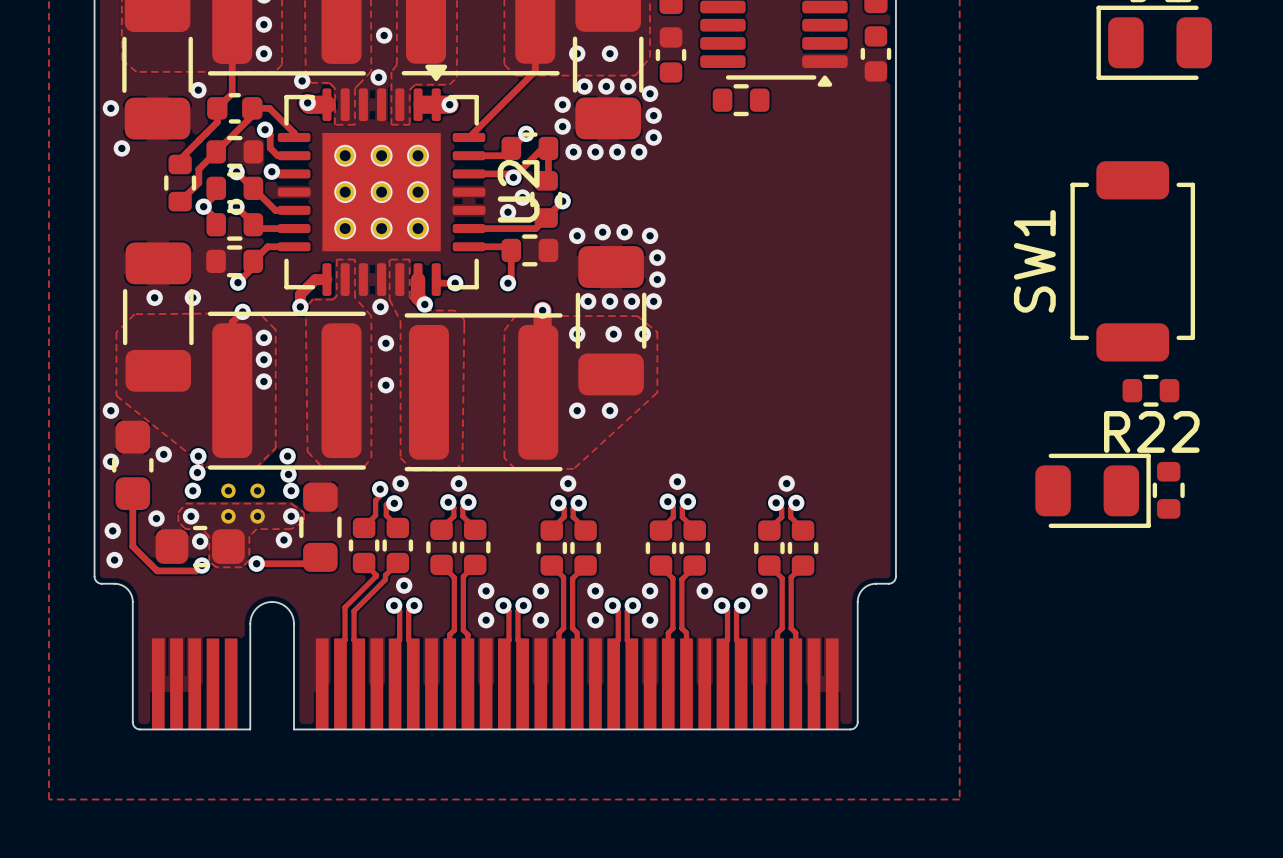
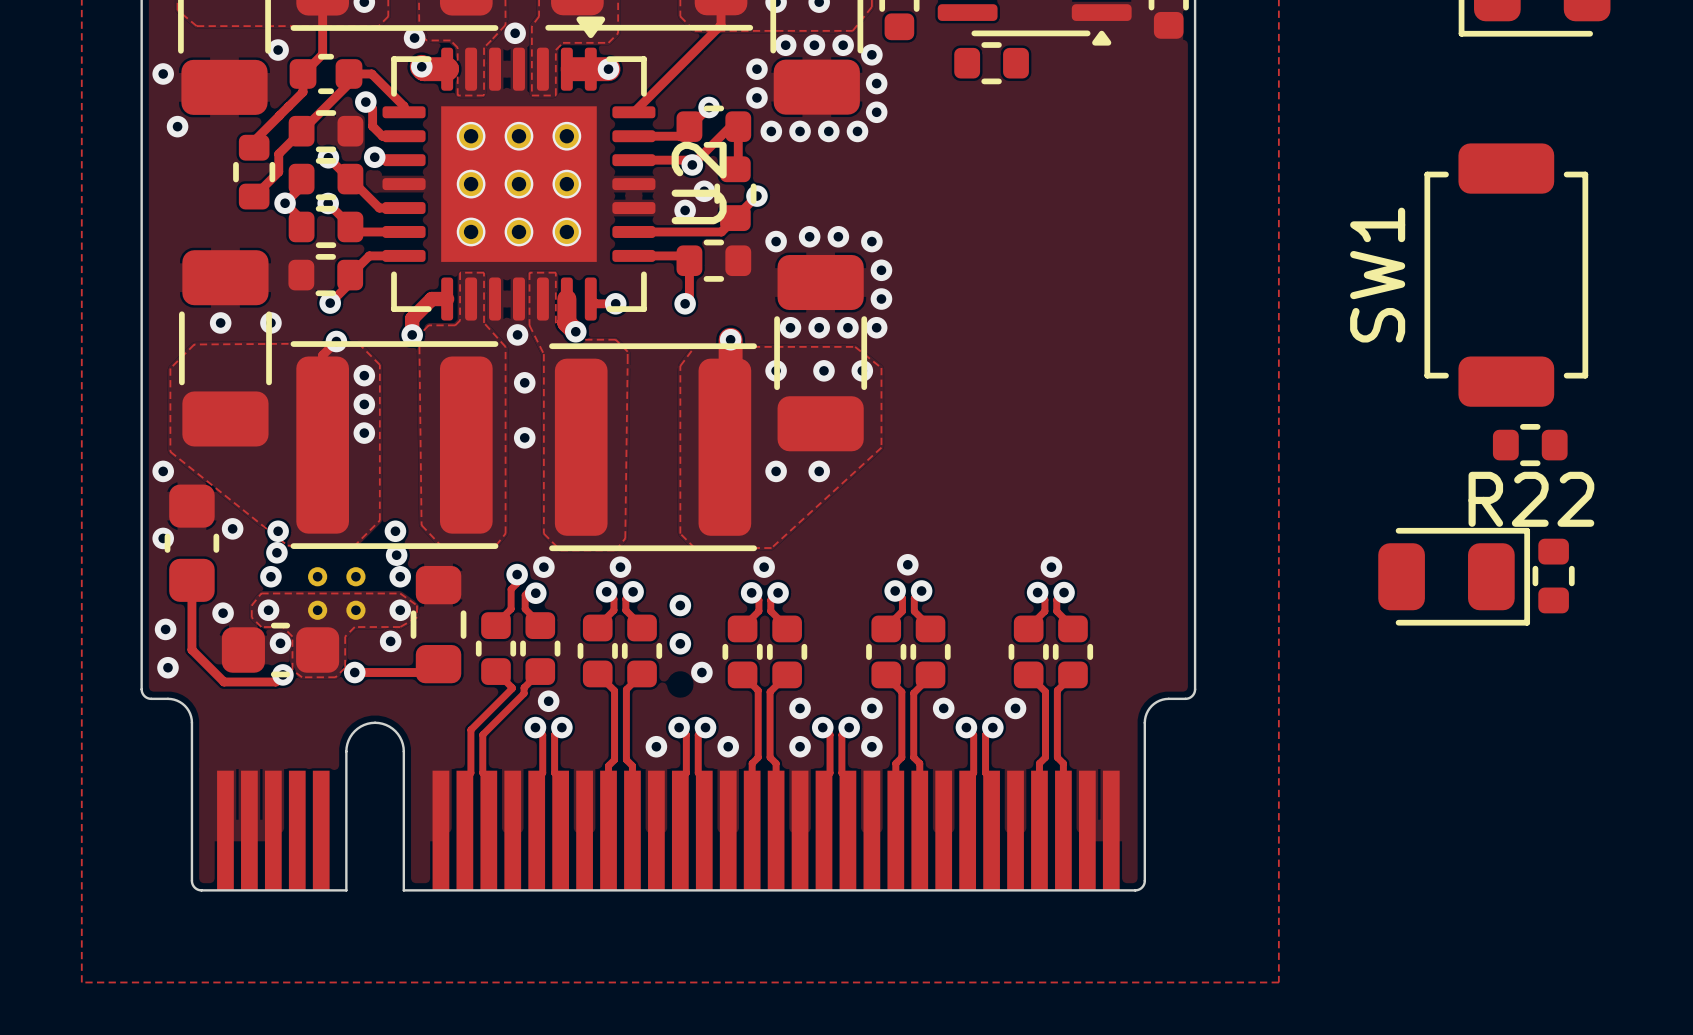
via: none -> (680, 605)
via: none -> (680, 643)
via: none -> (701, 672)
via: (486, 591) -> none
via: (540, 591) -> none

